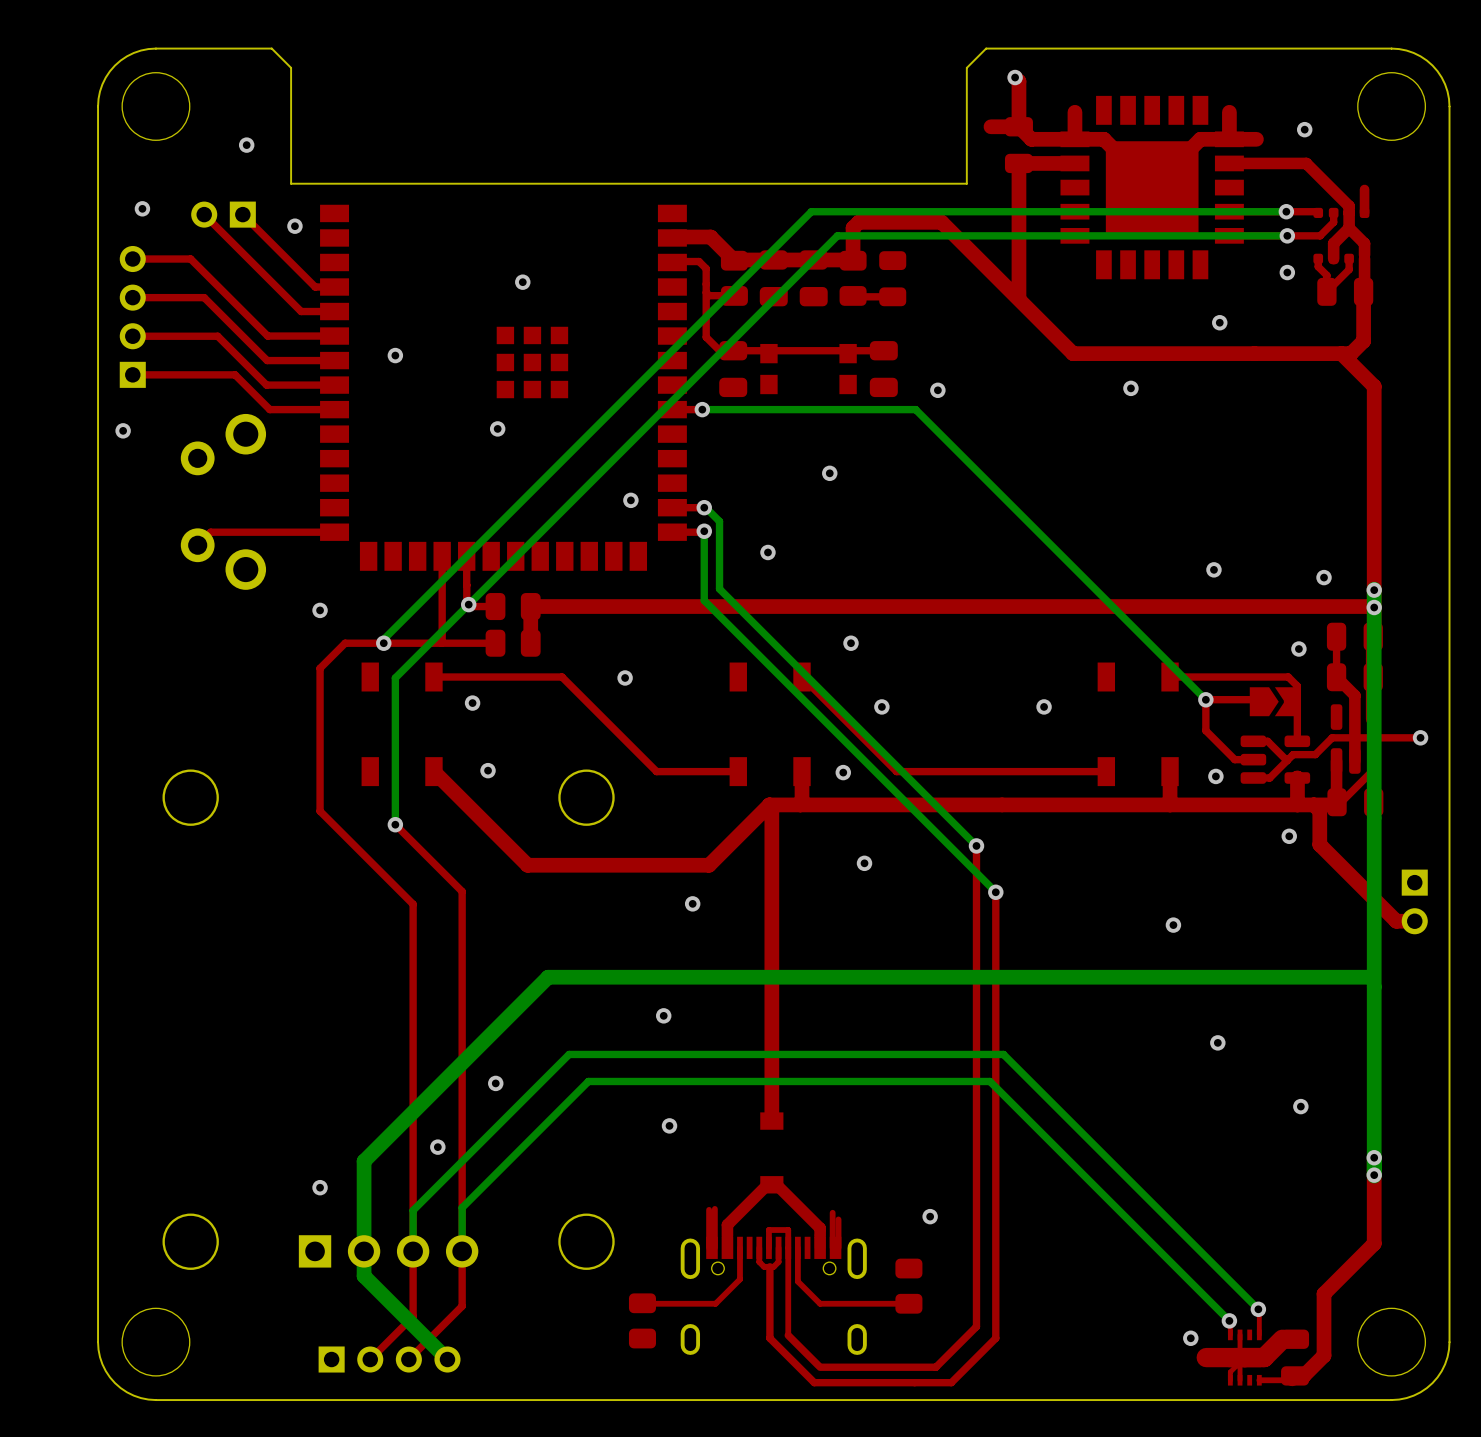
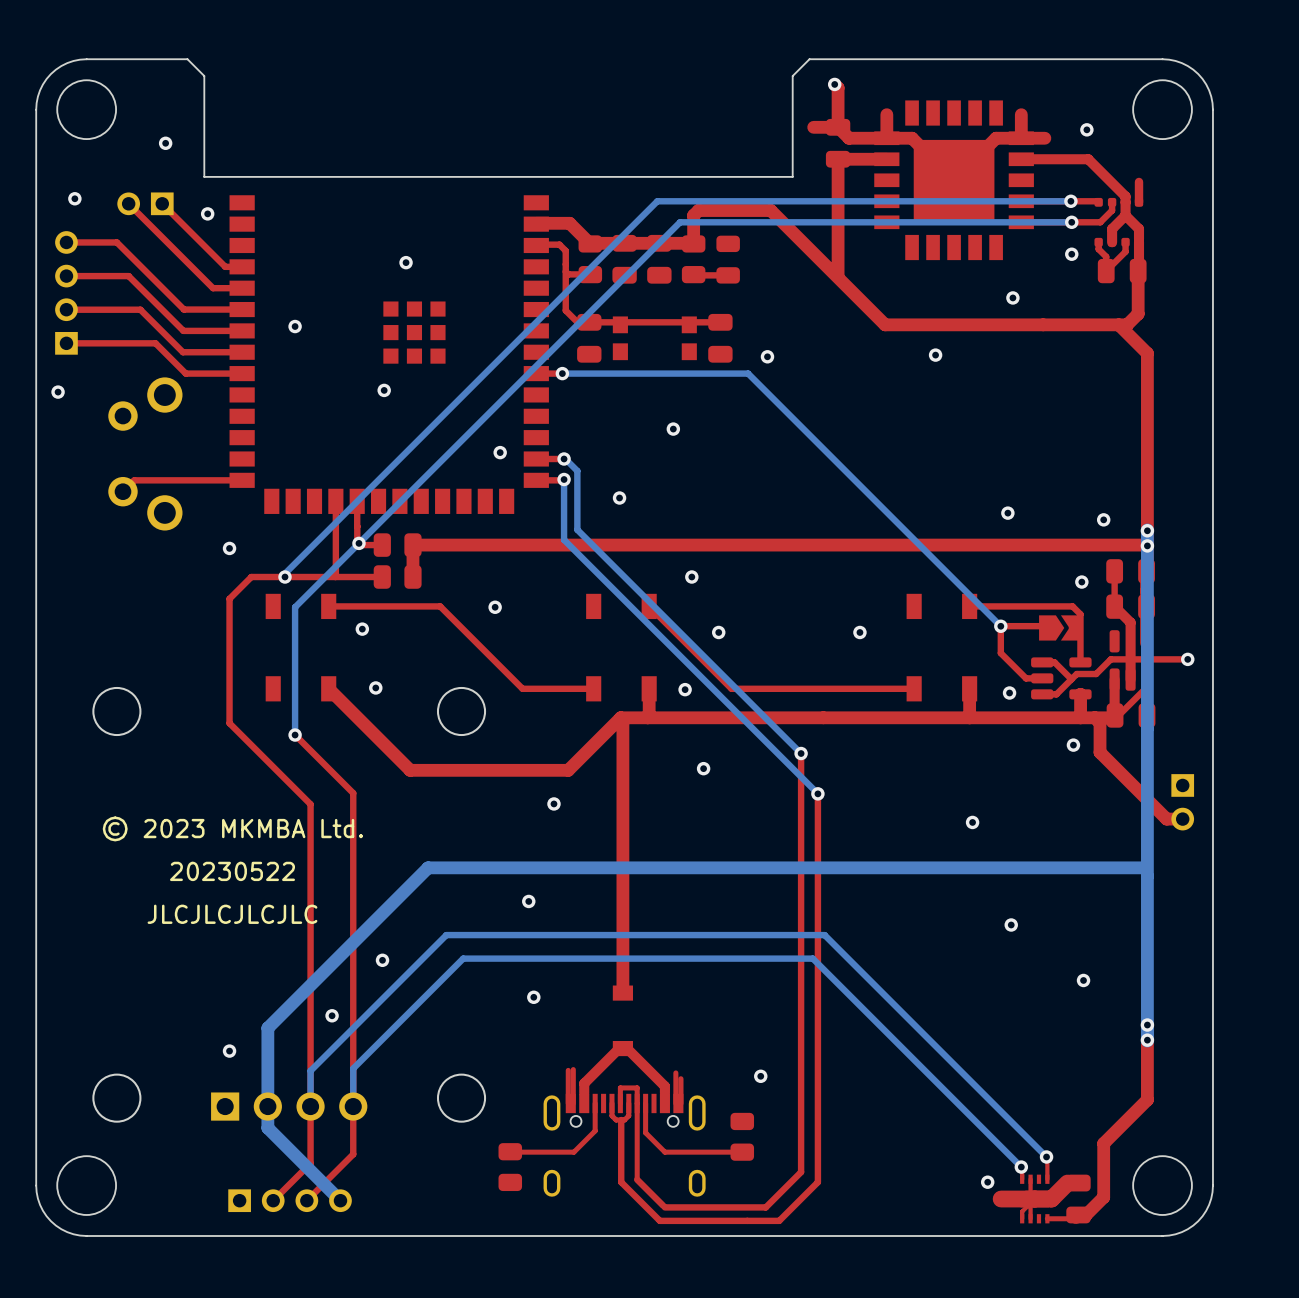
text: none -> © 2023 MKMBA Ltd. (232, 828)
text: none -> 20230522 (232, 871)
text: none -> JLCJLCJLCJLC (232, 914)

